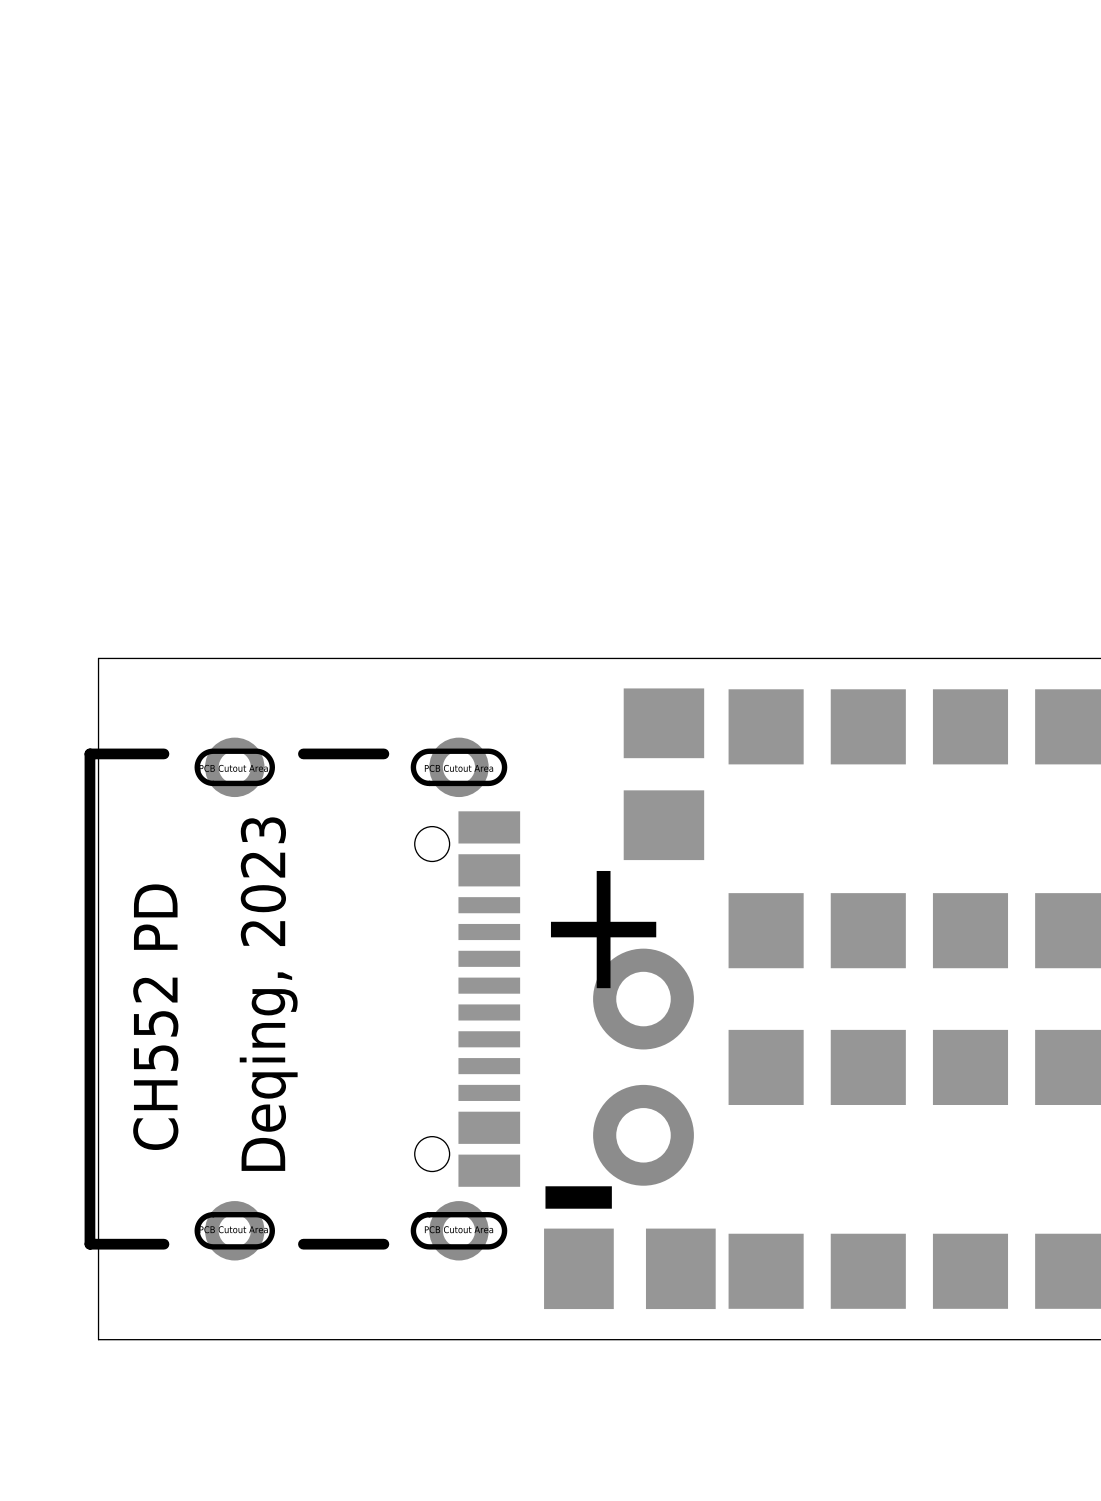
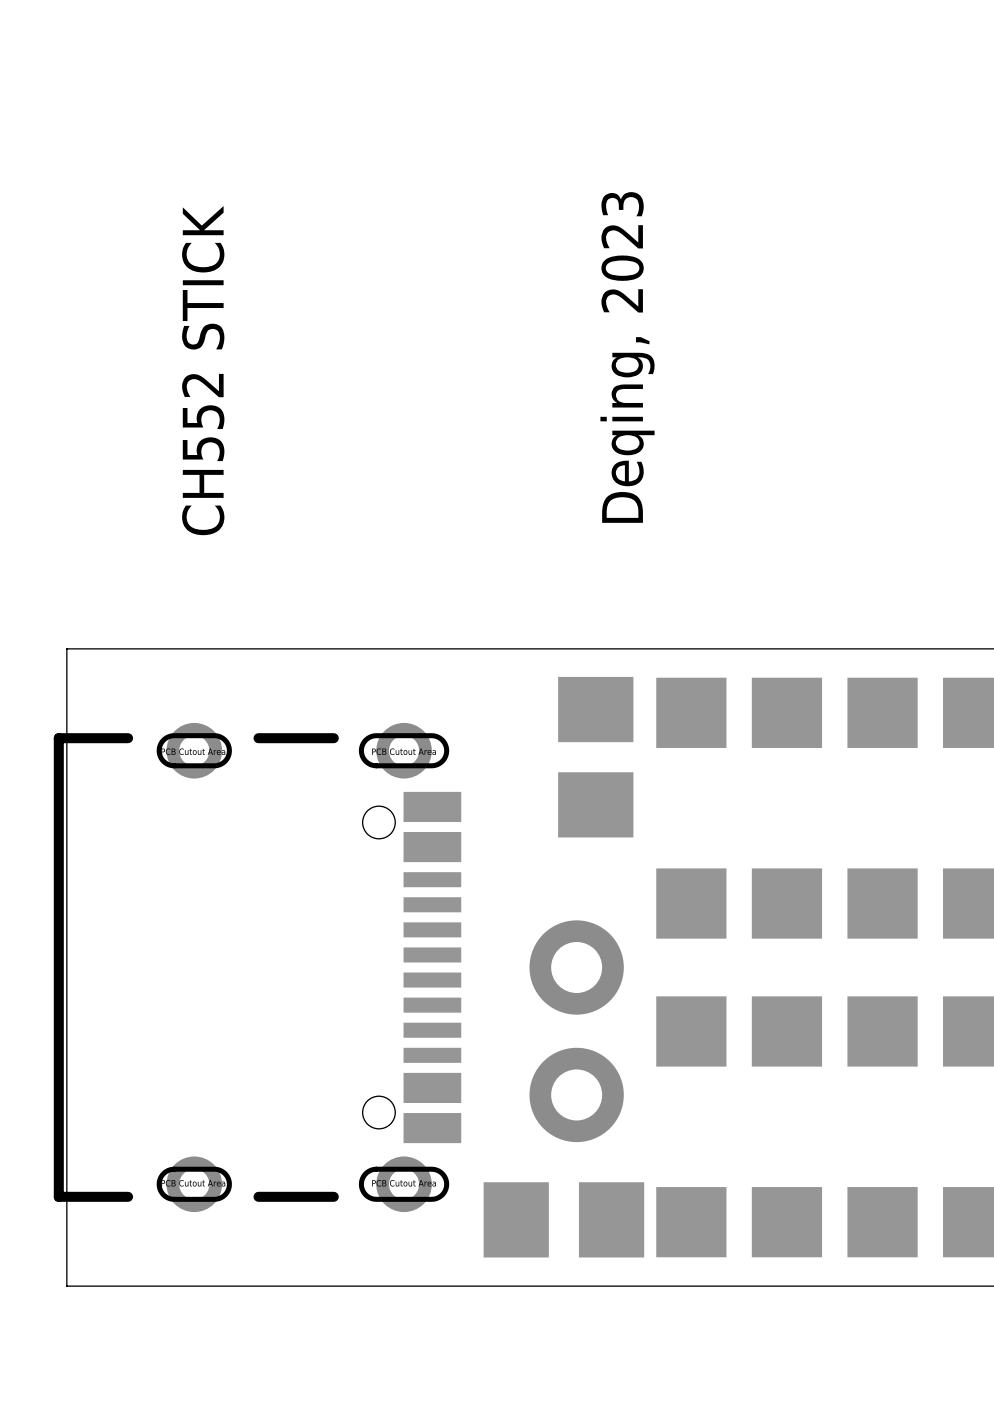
text: none -> CH552 STICK (203, 370)
text: + (603, 929) -> none
text position: Deqing, 2023 (268, 994) -> Deqing, 2023 (627, 357)
text: CH552 PD (155, 1017) -> none
text: - (578, 1197) -> none

